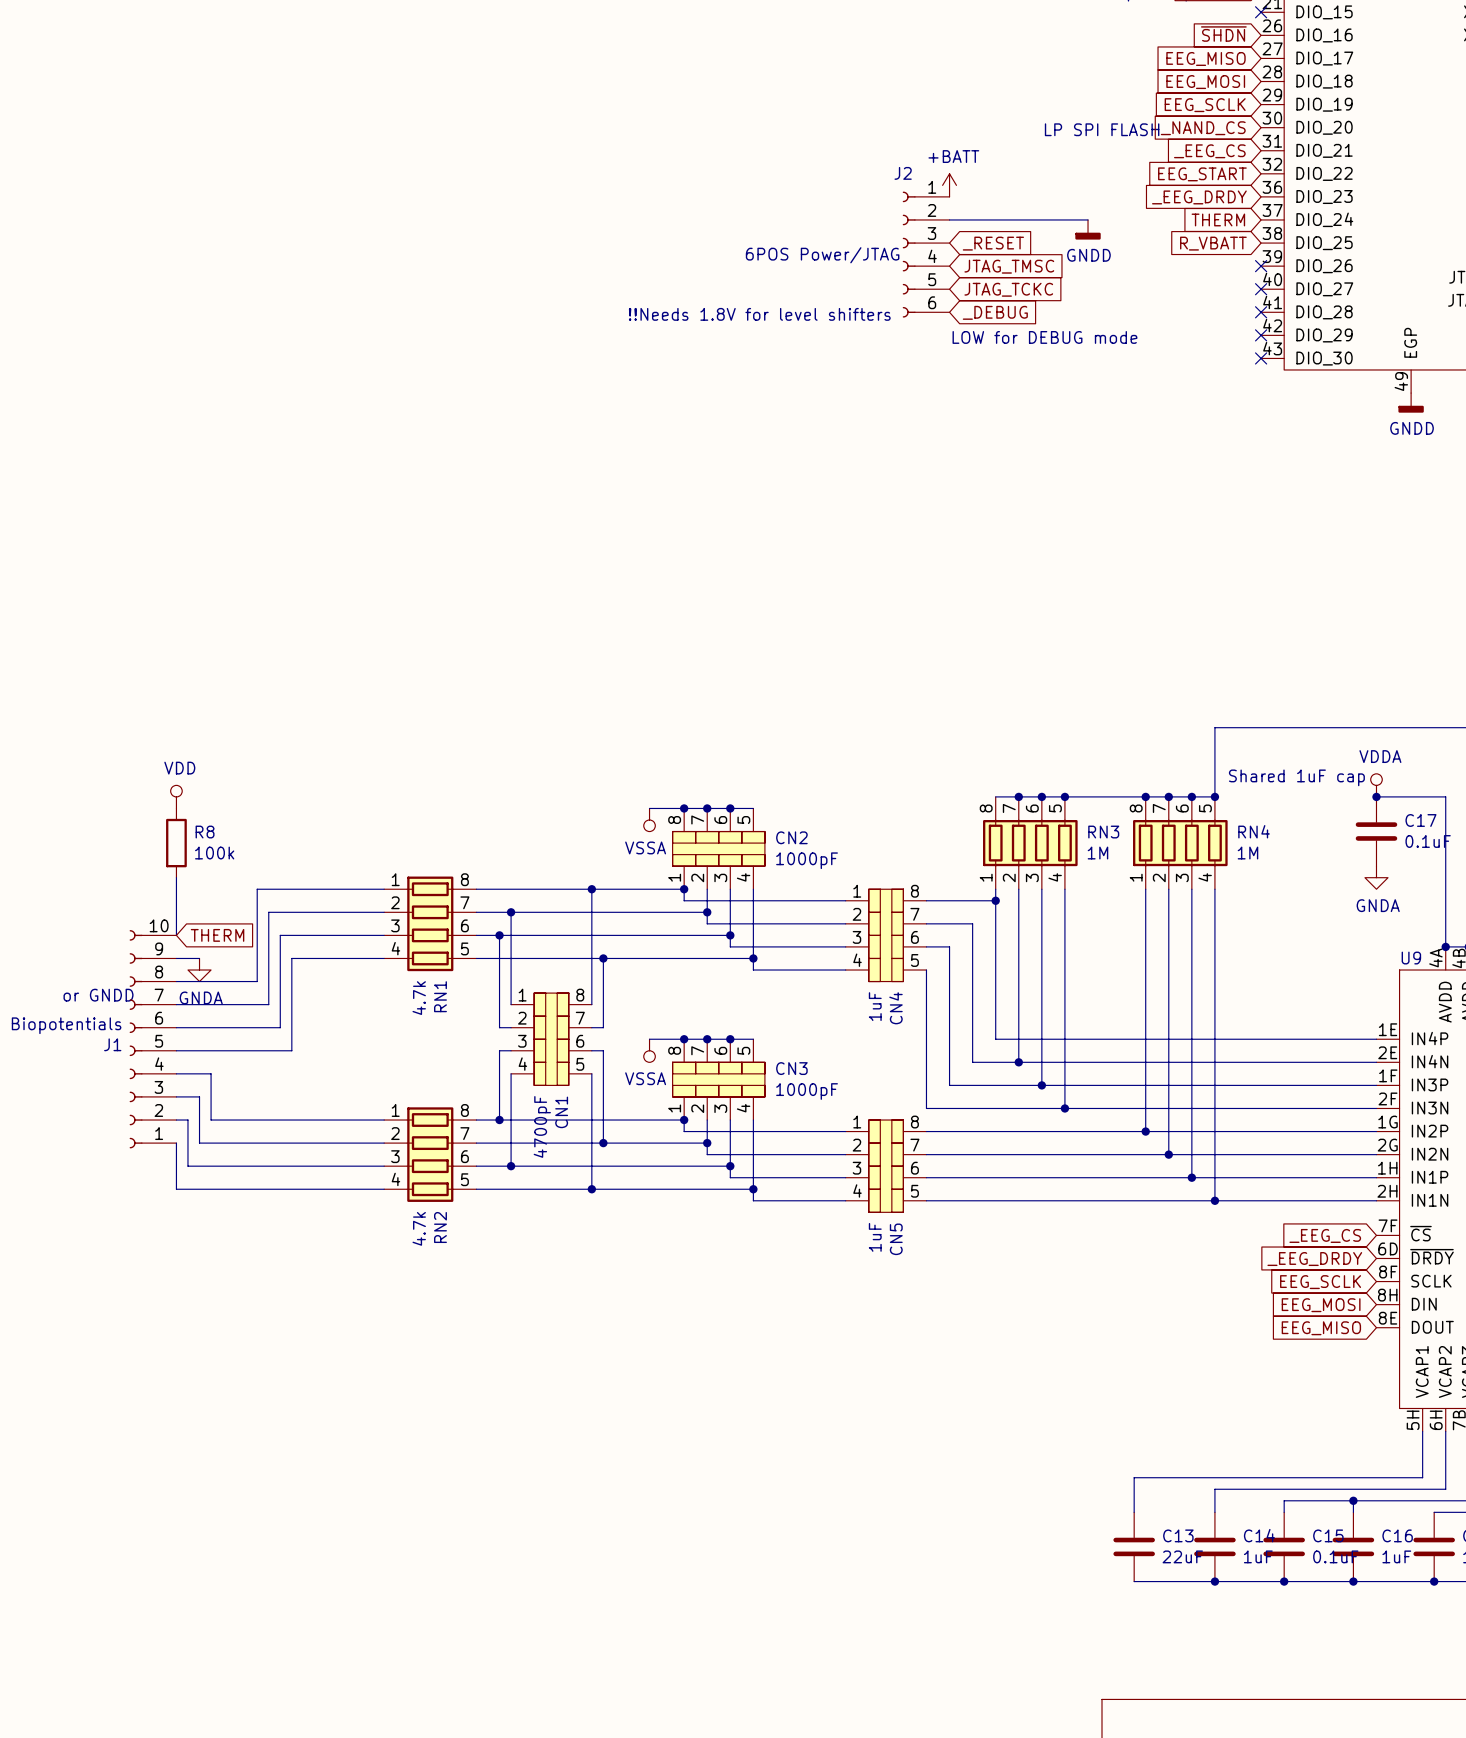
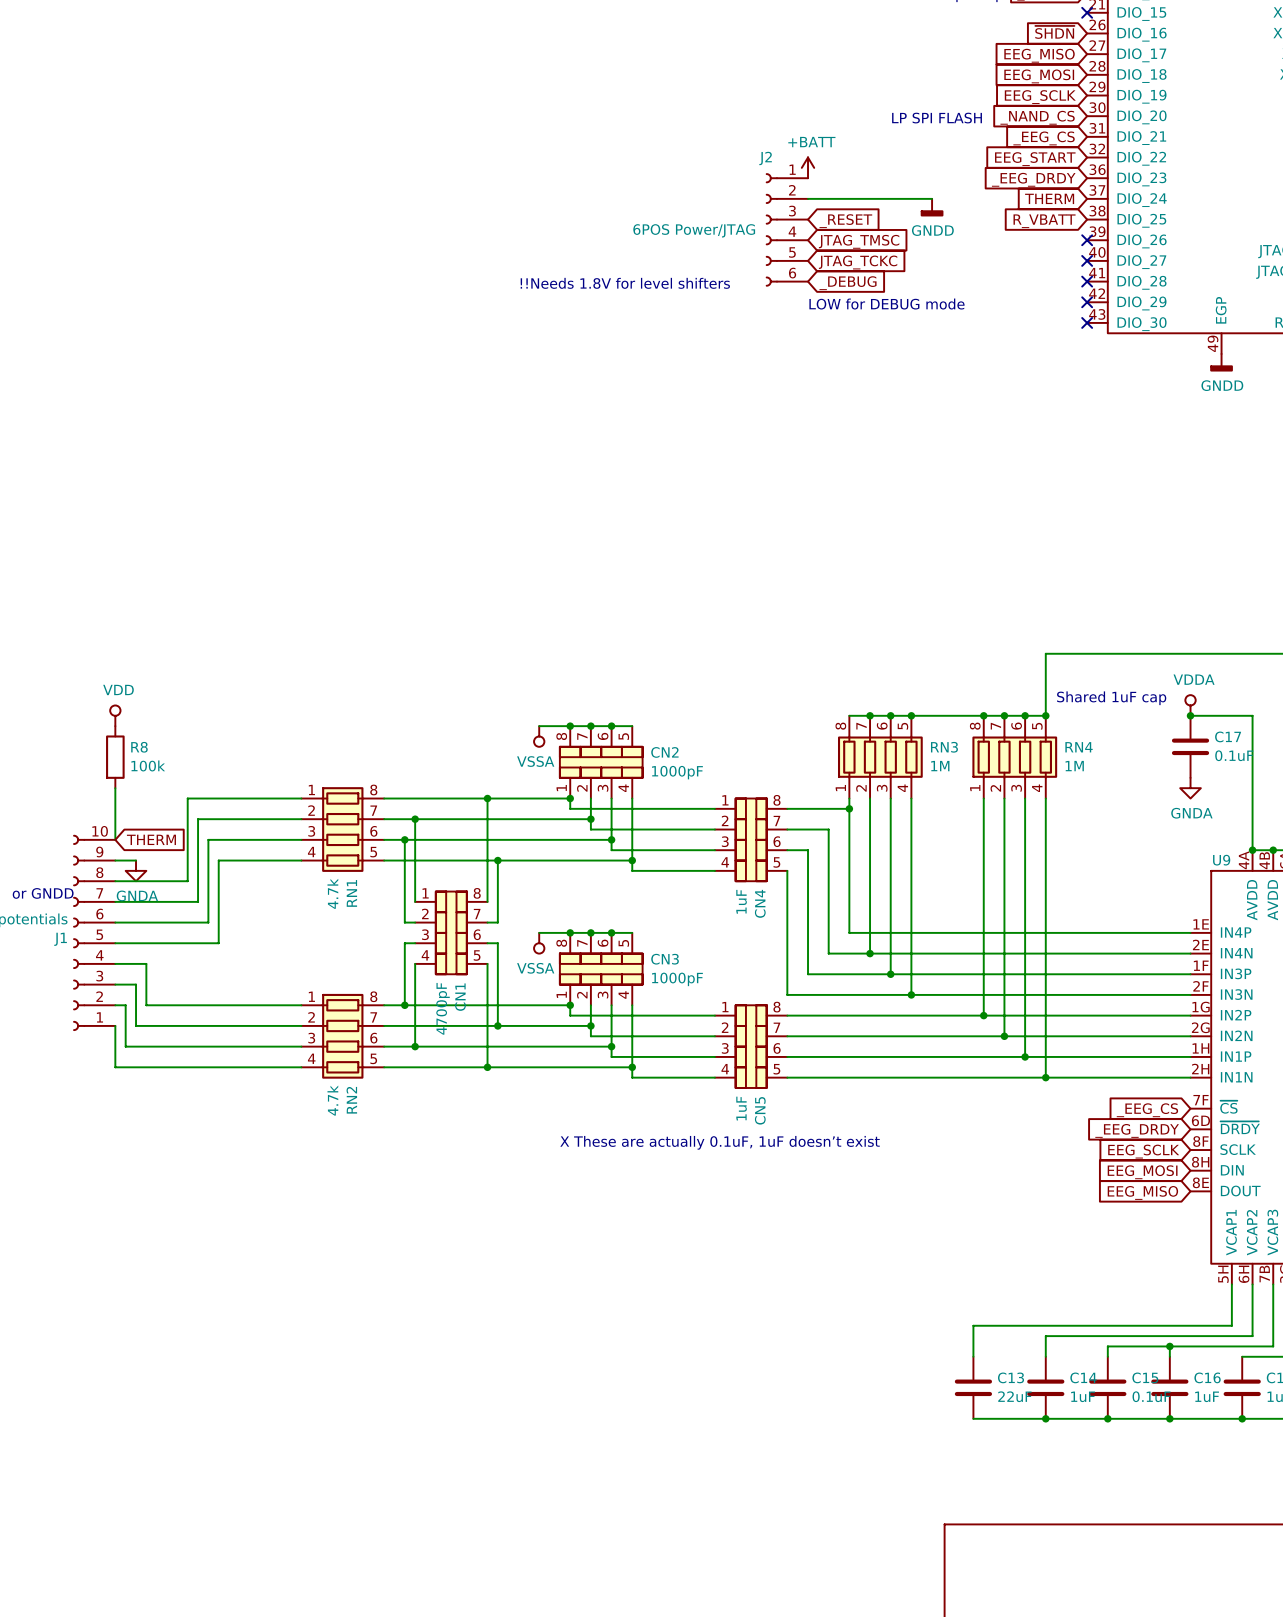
text: none -> X These are actually 0.1uF, 1uF doesn’t exist (720, 1142)

